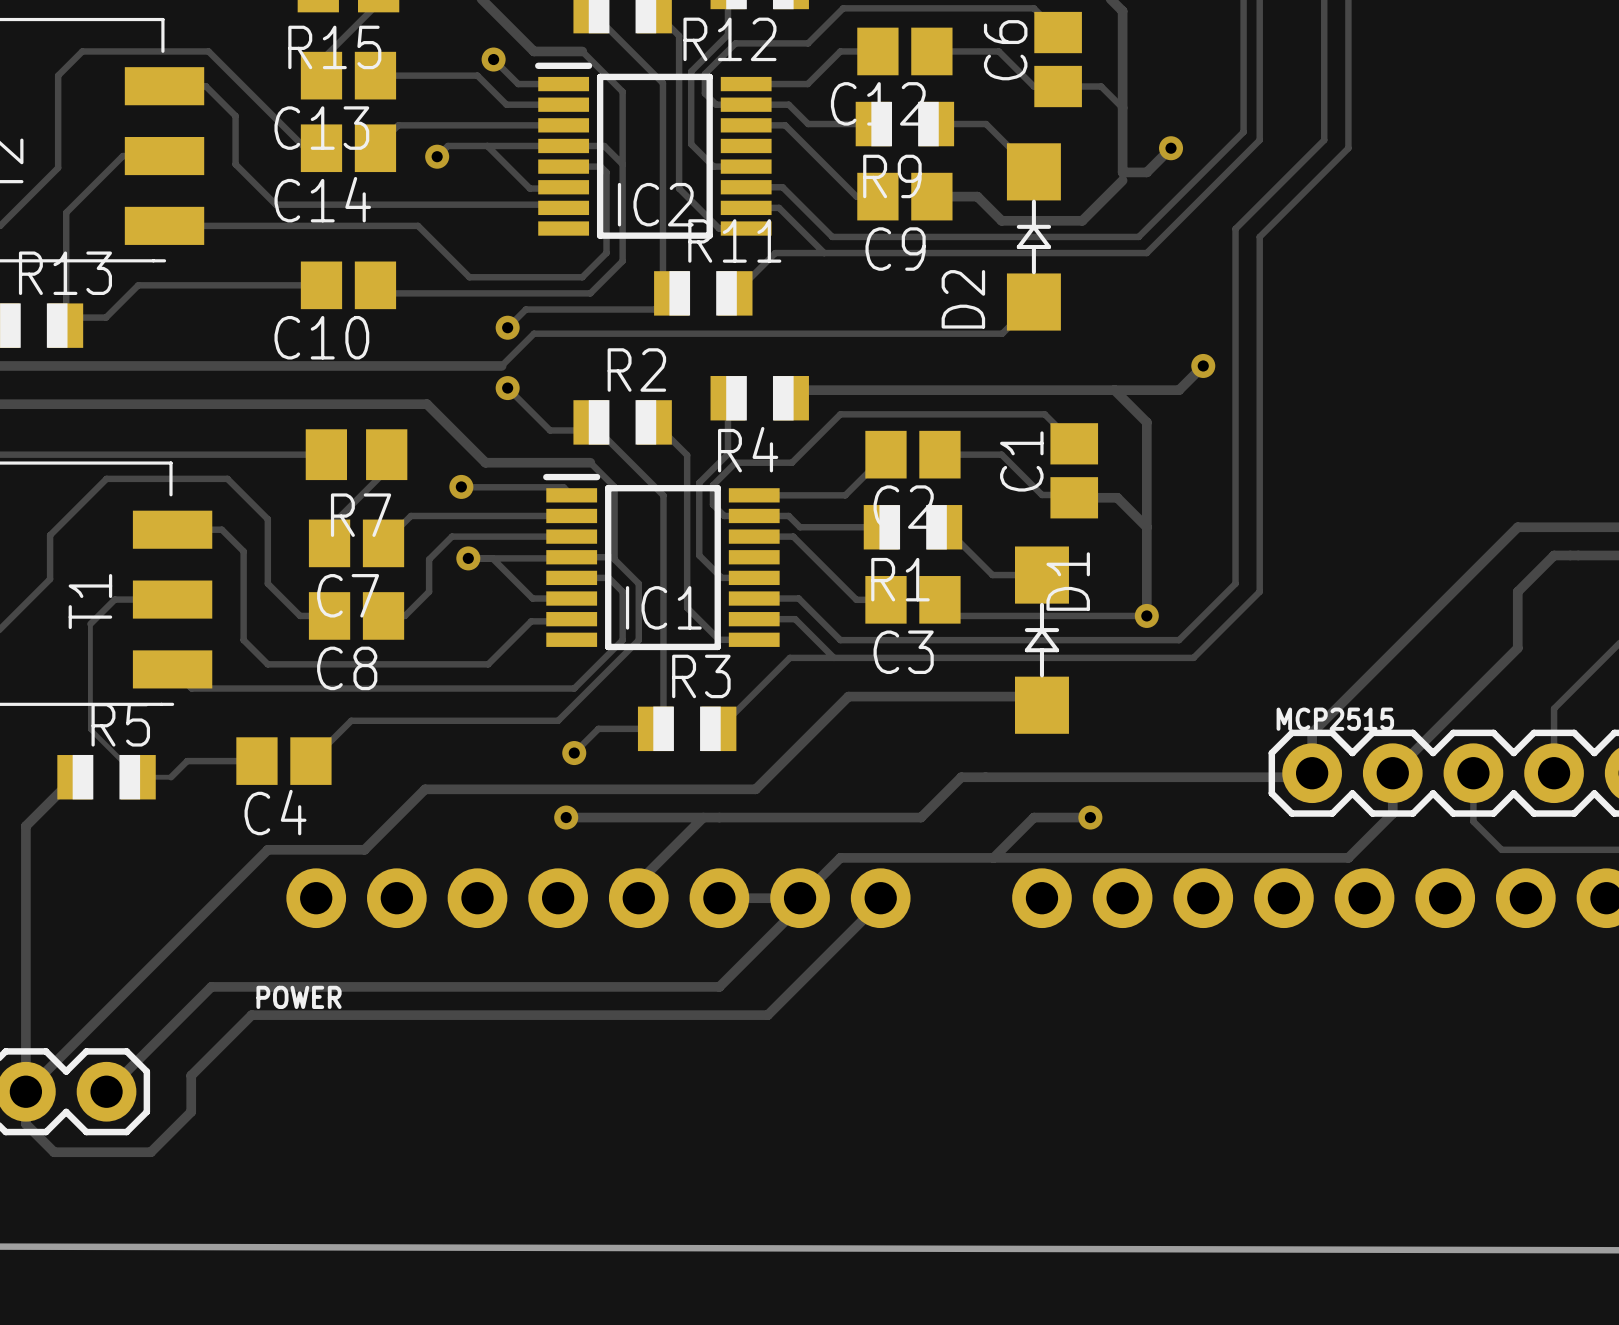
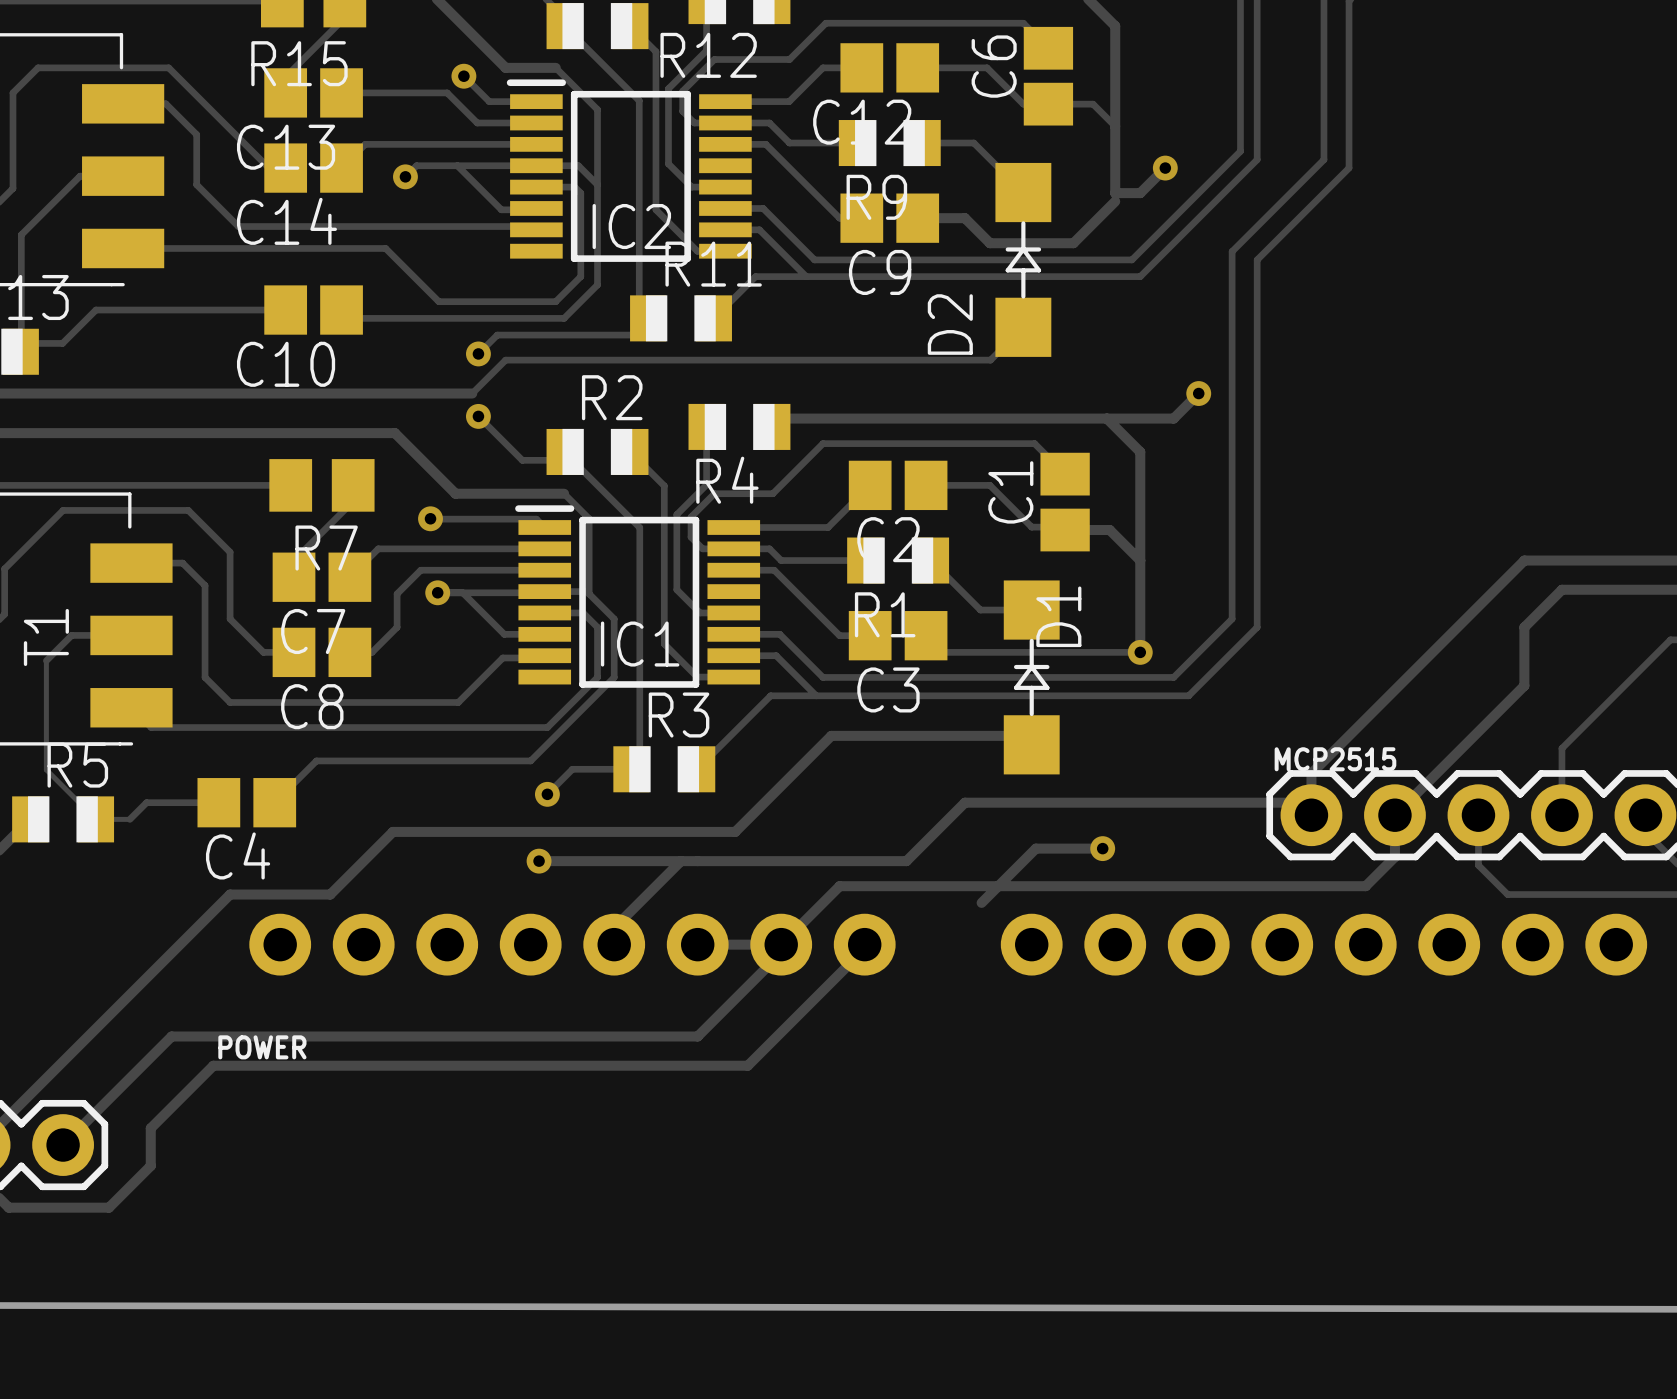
track: (1312, 773) (1308, 777) (961, 777) -> (1311, 815) (1298, 802) (964, 802) (948, 819)
track: (1033, 817) (1090, 817) -> (1023, 861) (1035, 848) (1102, 848)
via position: (1090, 817) -> (1102, 848)
track: (1364, 841) (1348, 857) (840, 857) -> (1365, 886) (839, 886) (822, 902)

